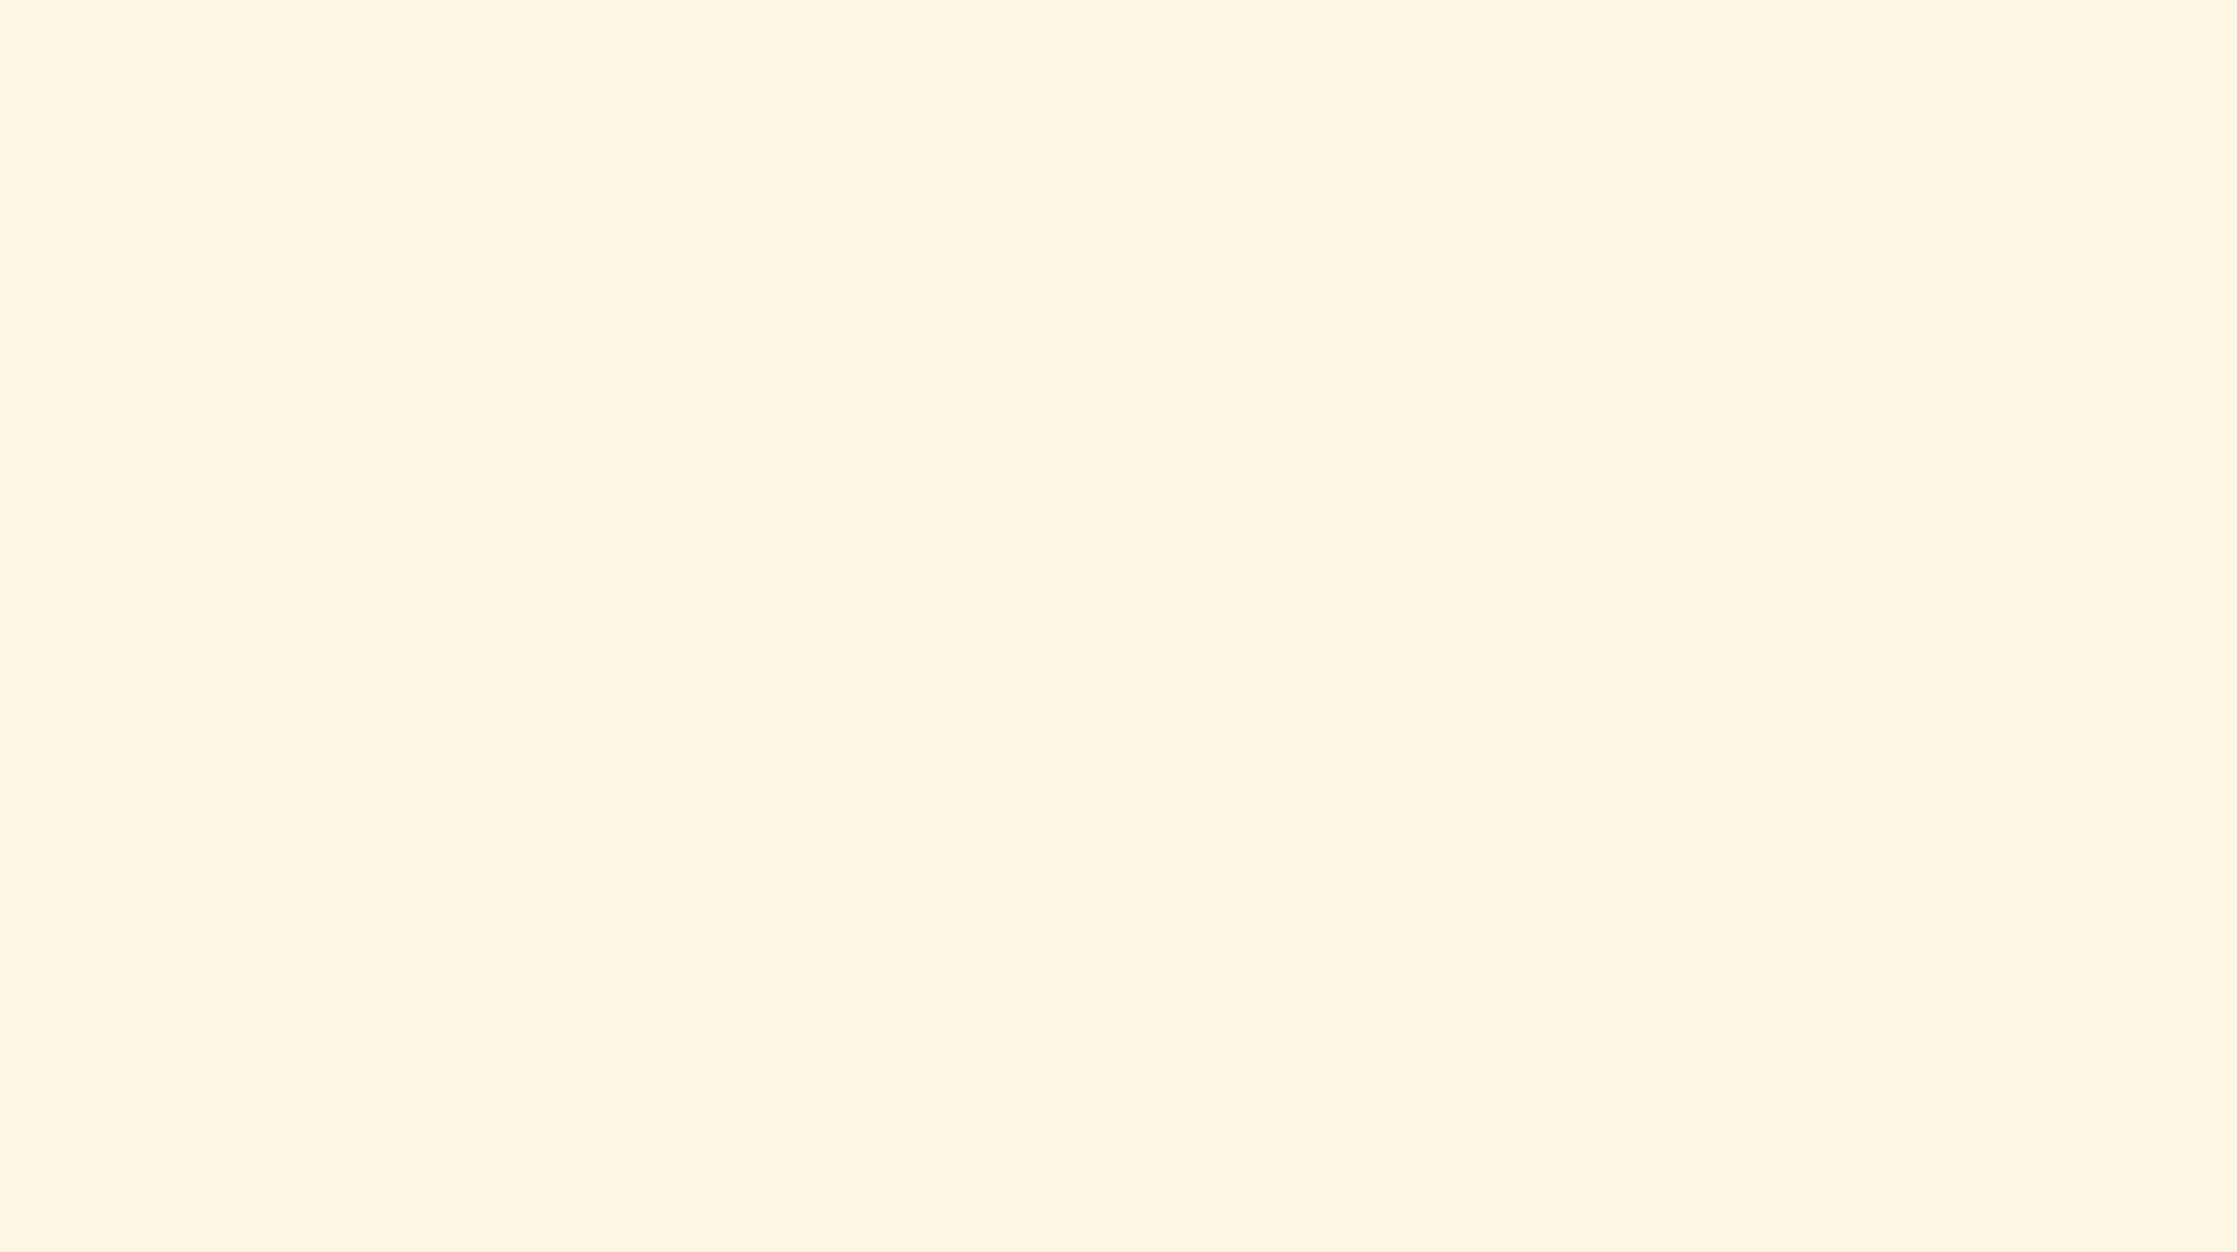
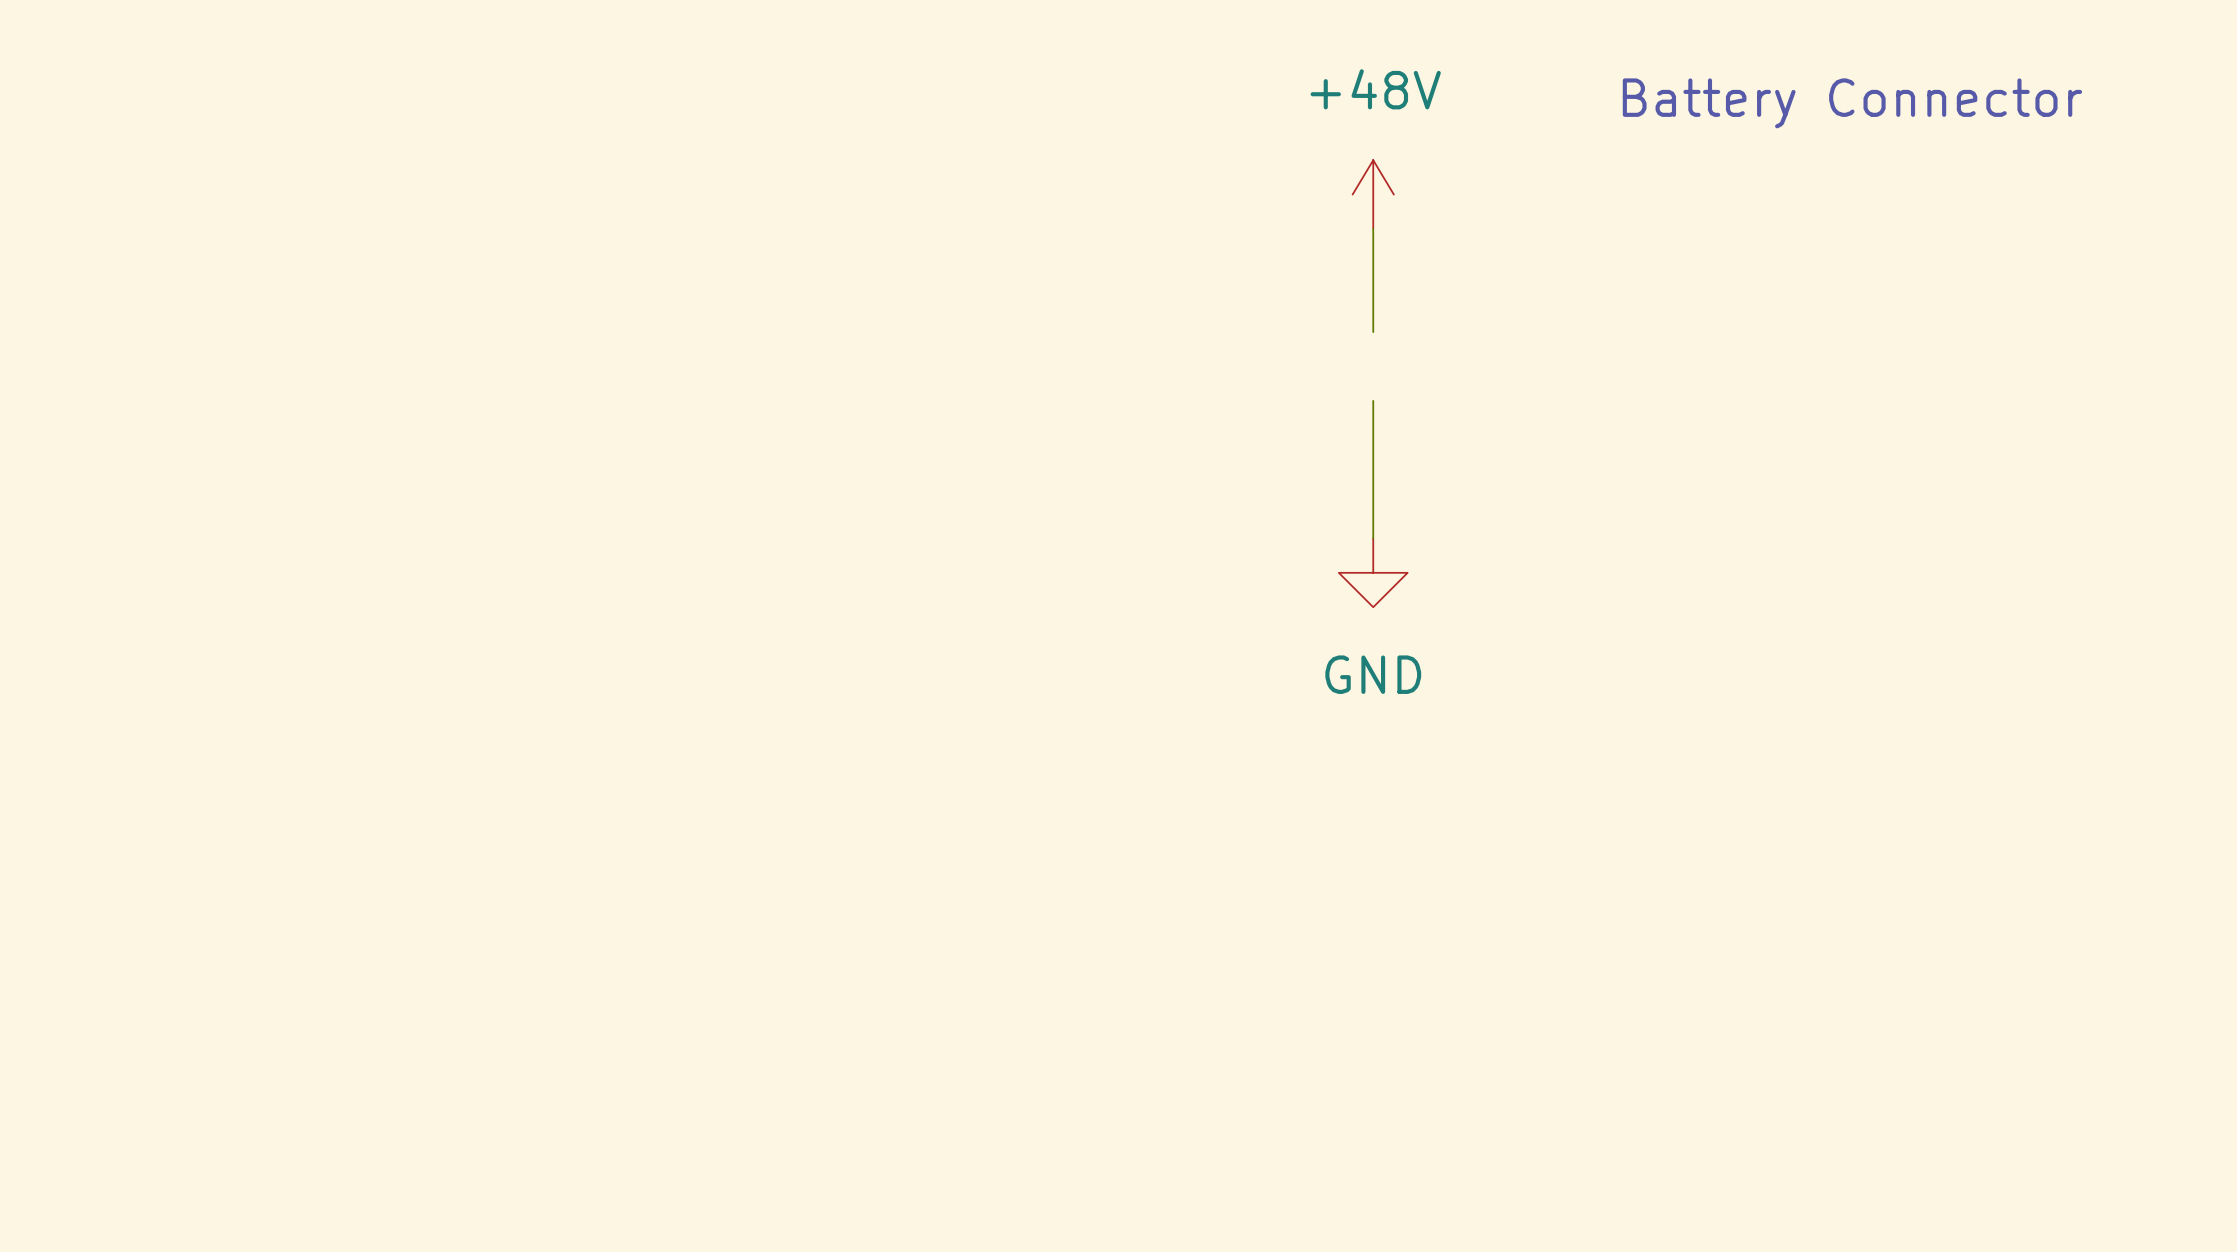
text: none -> Battery Connector (1852, 103)
power symbol: none -> +48V (1373, 194)
wire: none -> (1373, 228) (1373, 332)
wire: none -> (1373, 400) (1373, 538)
power symbol: none -> GND (1373, 572)

